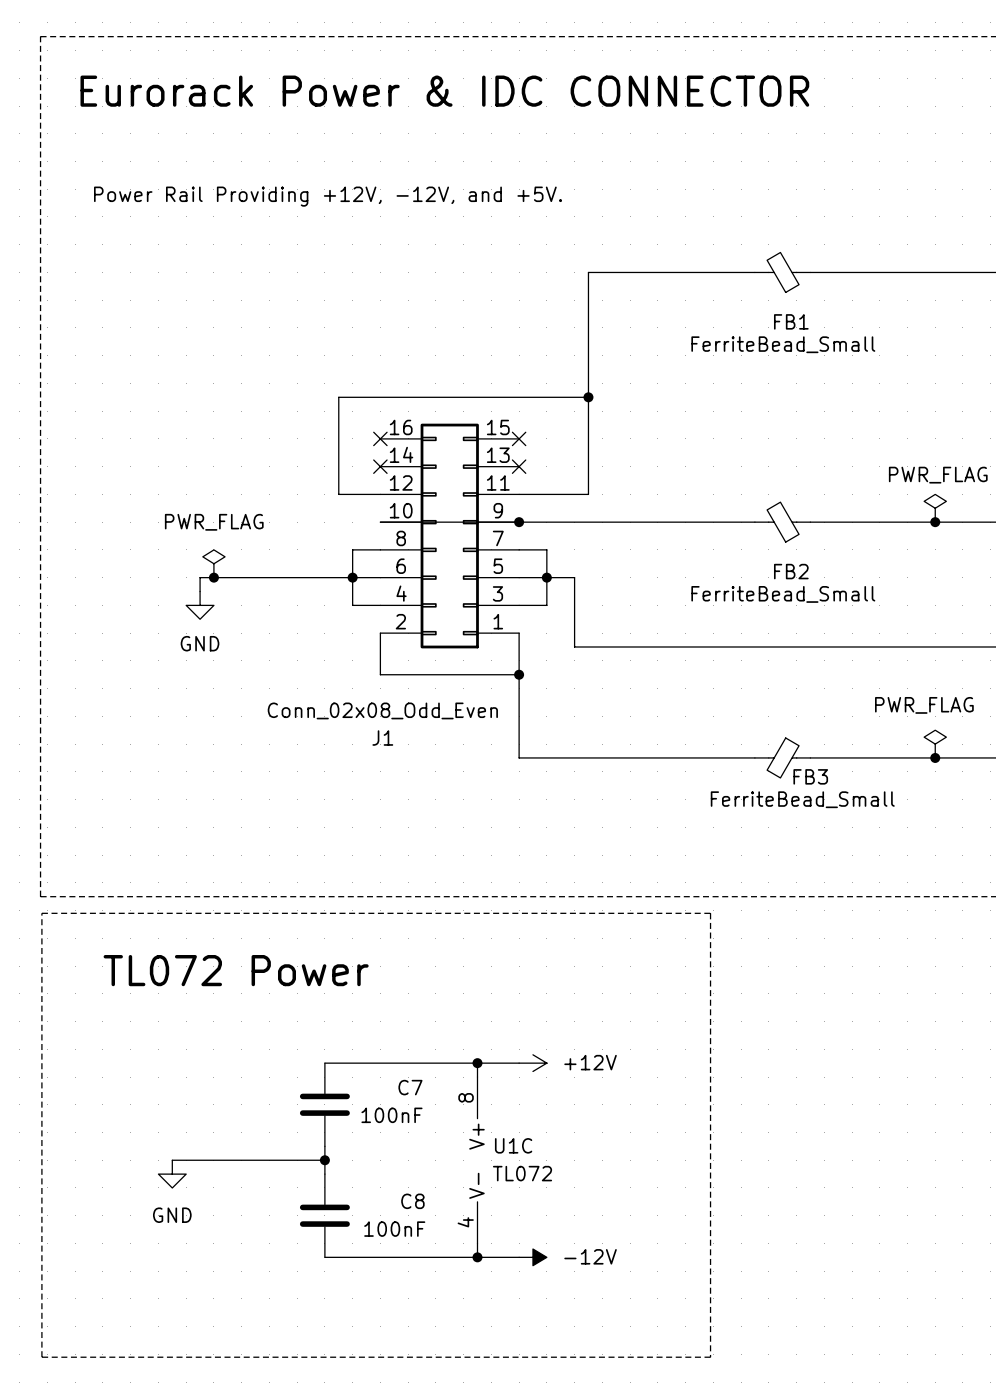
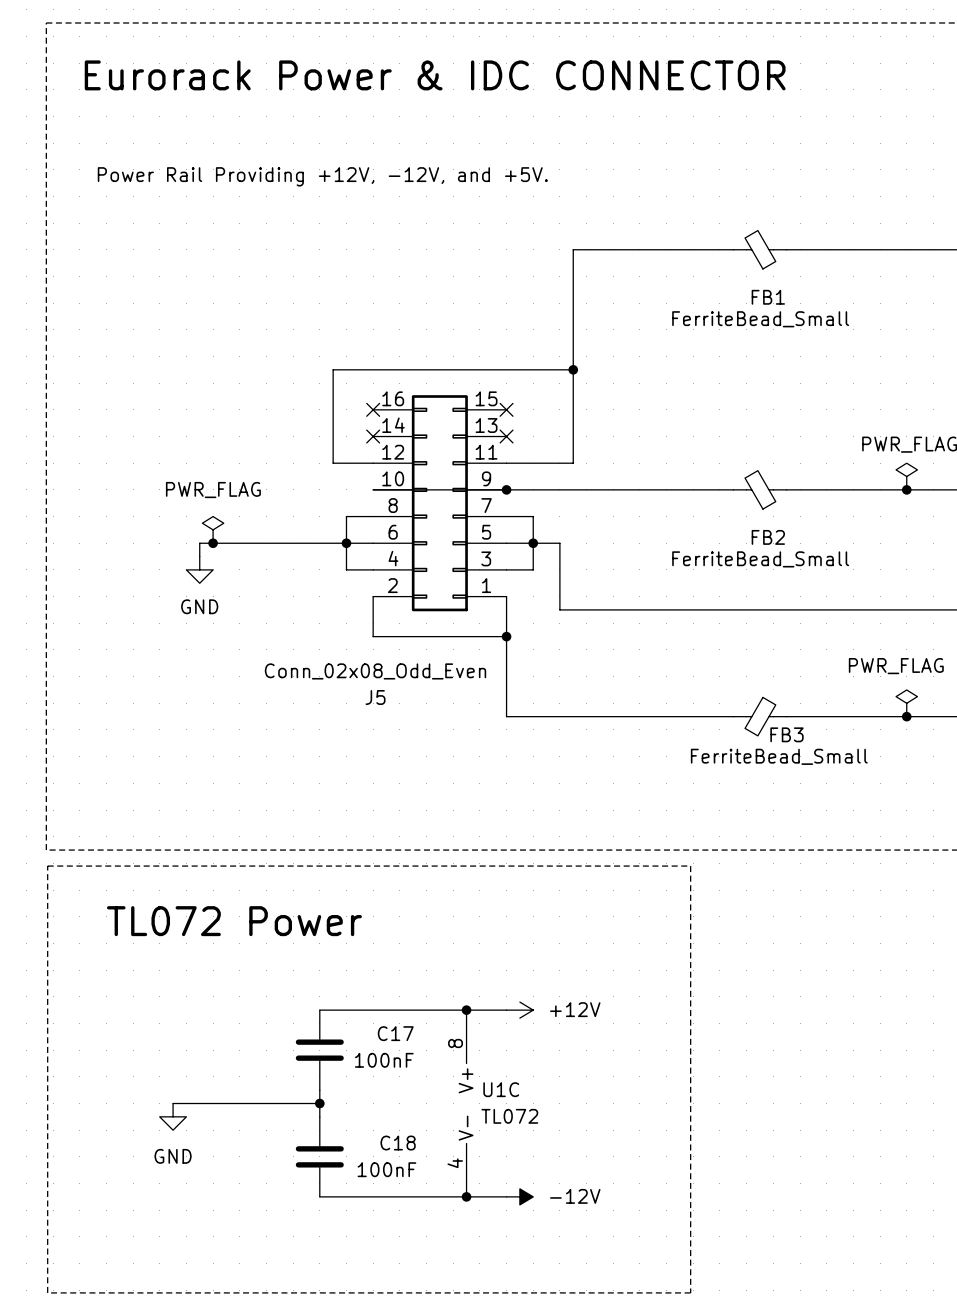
J1 name: J1 (382, 738) -> J5 (375, 697)
C7 name: C7 (410, 1087) -> C17 (395, 1033)
C8 name: C8 (412, 1201) -> C18 (398, 1143)

